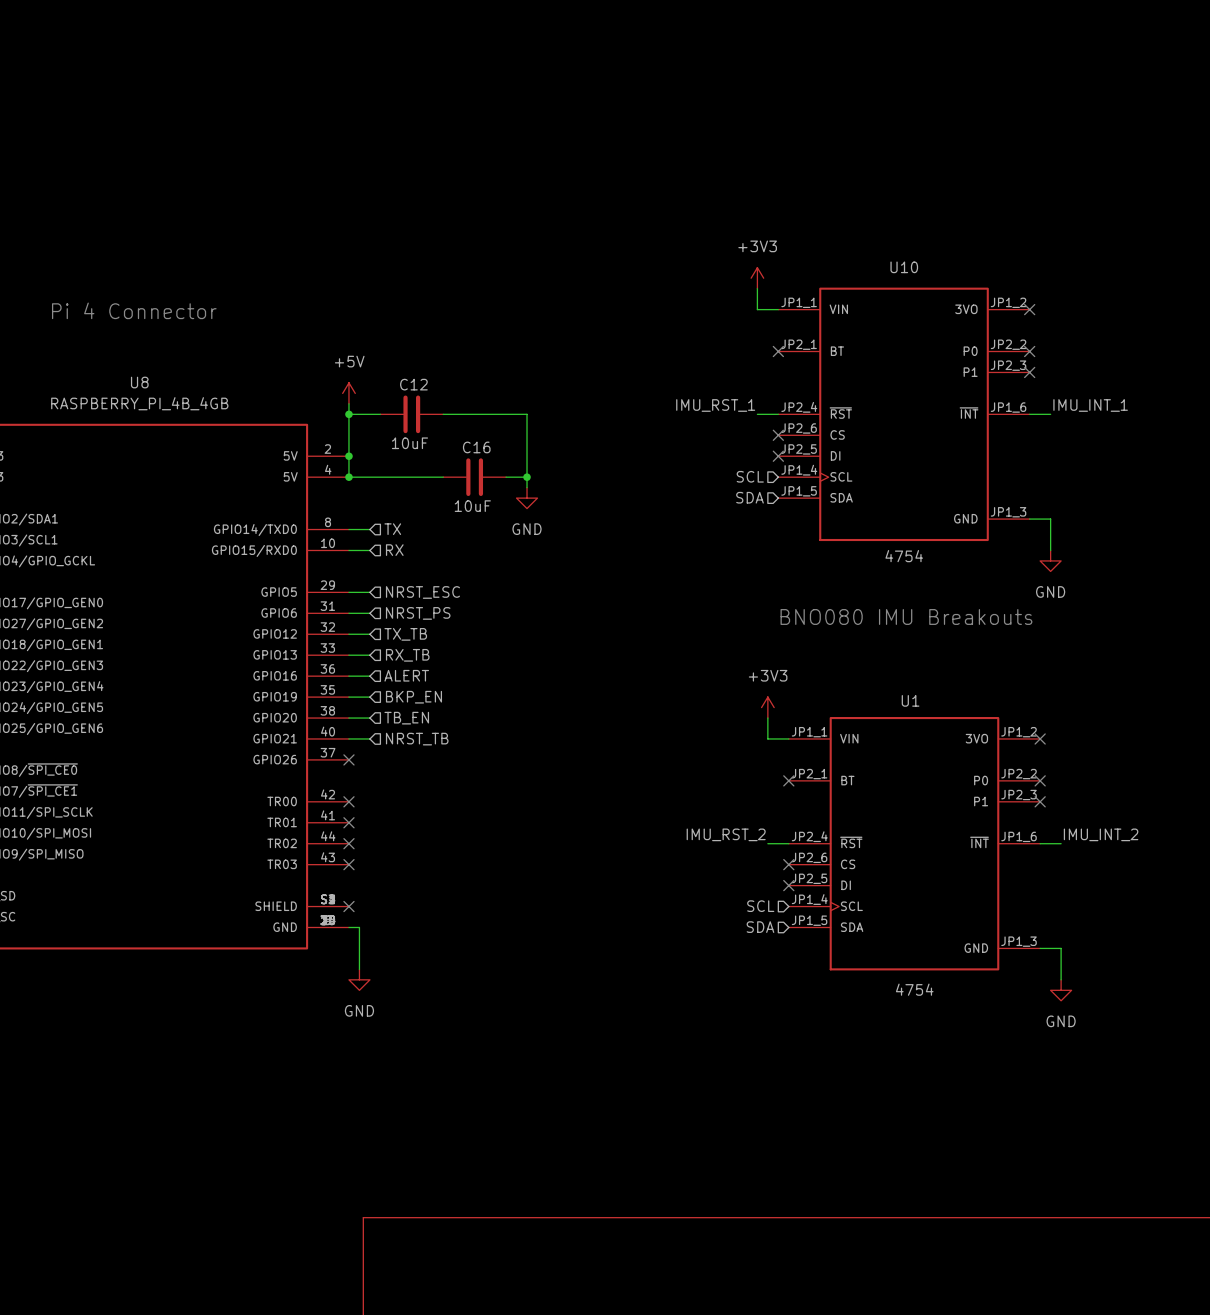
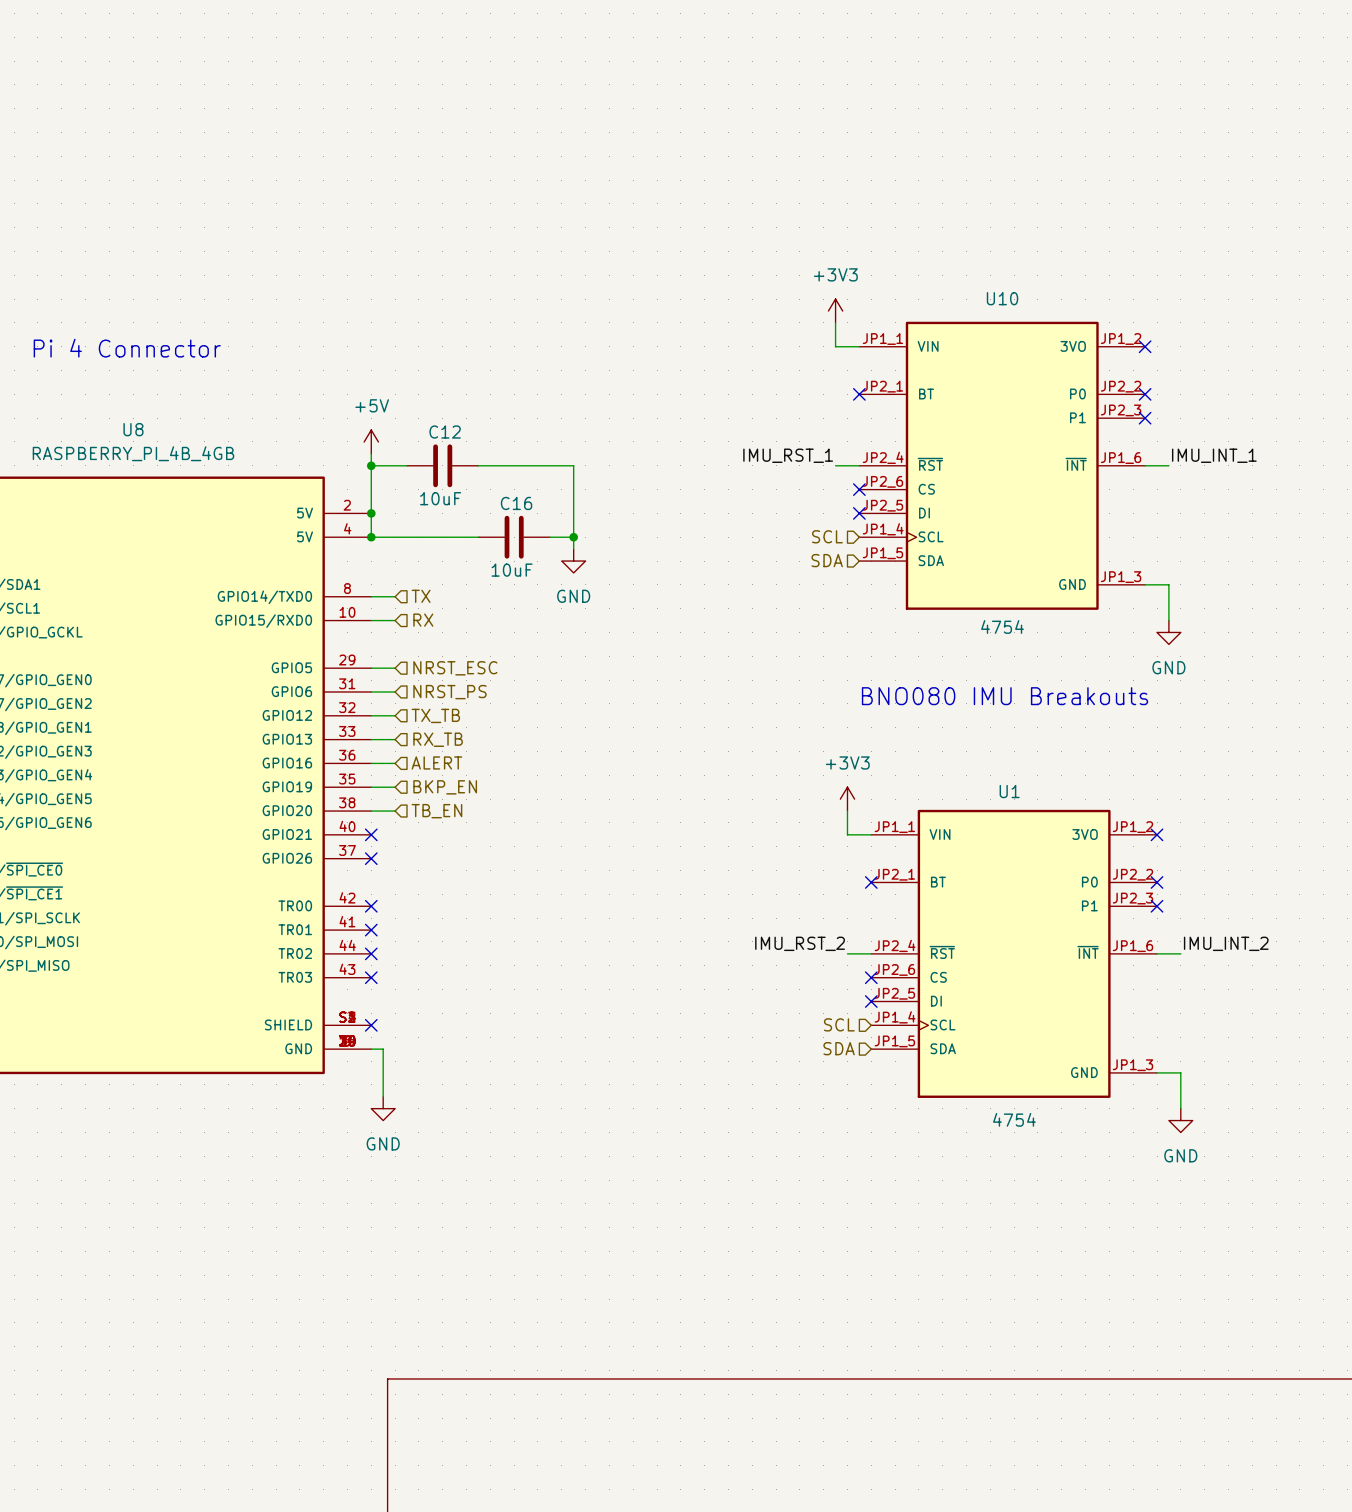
wire: (348, 738) (369, 738) -> none
no-connect mark: none -> (371, 834)
hierarchical label: NRST_TB (417, 739) -> none

